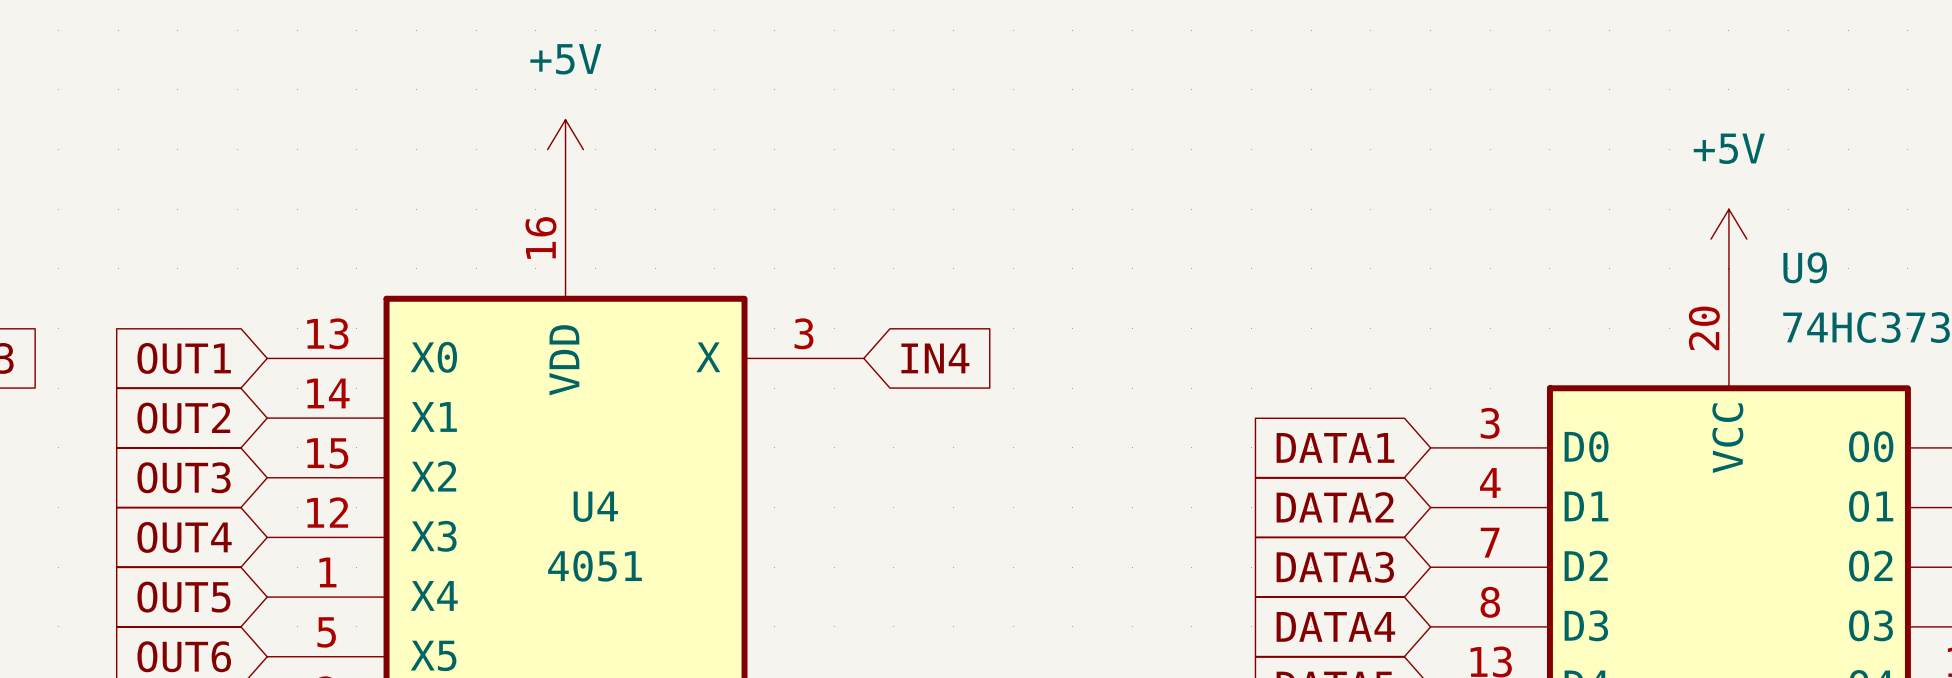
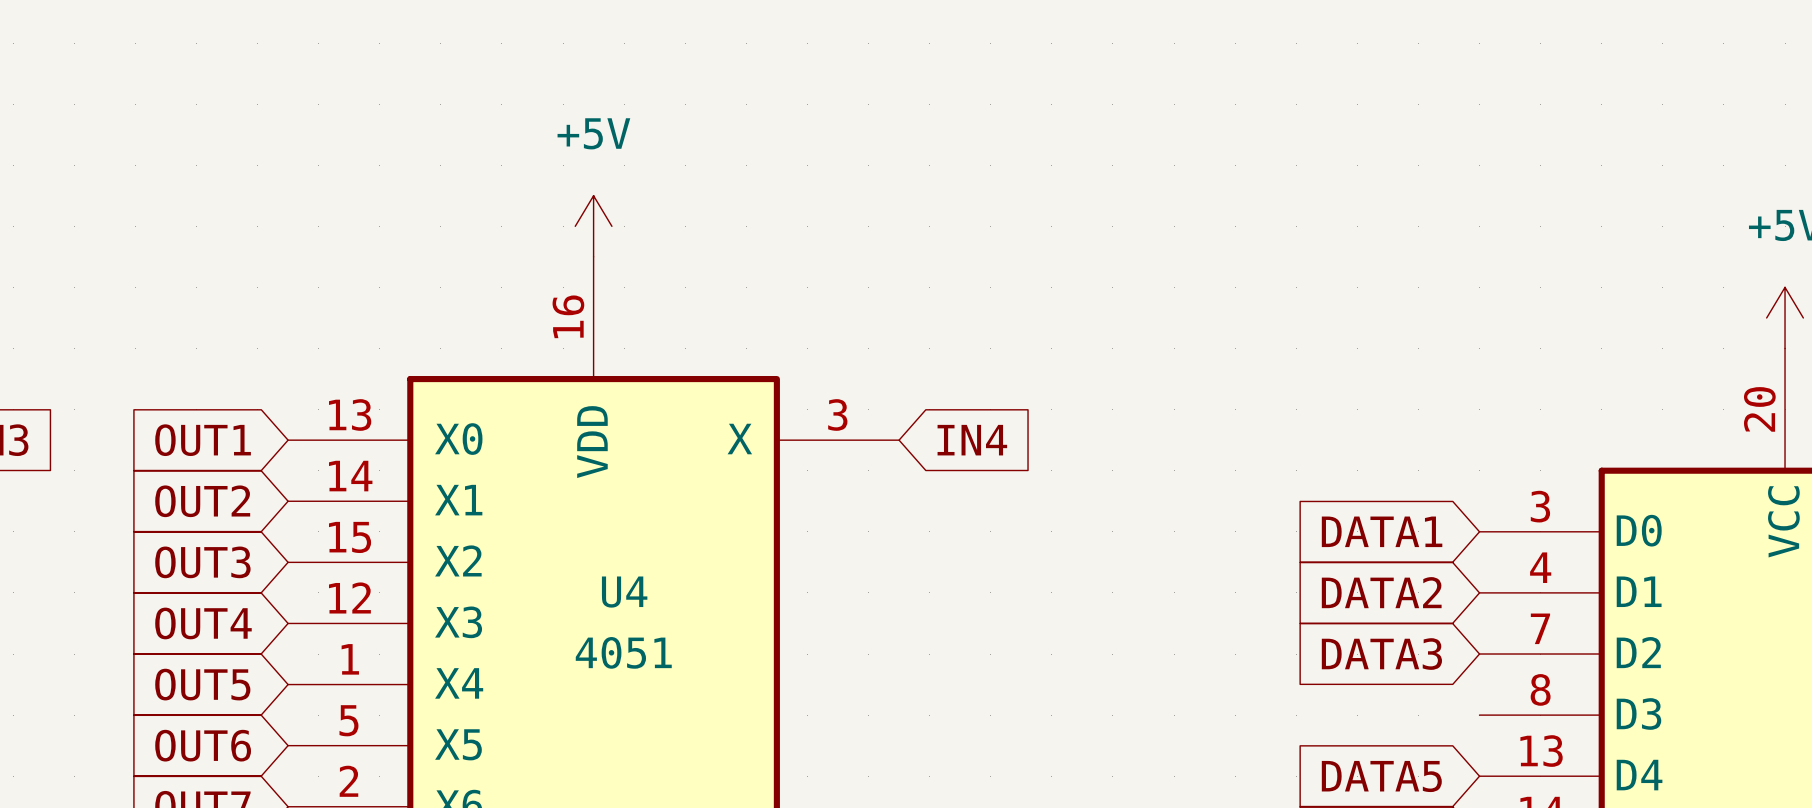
global label: DATA4 (1335, 626) -> none

